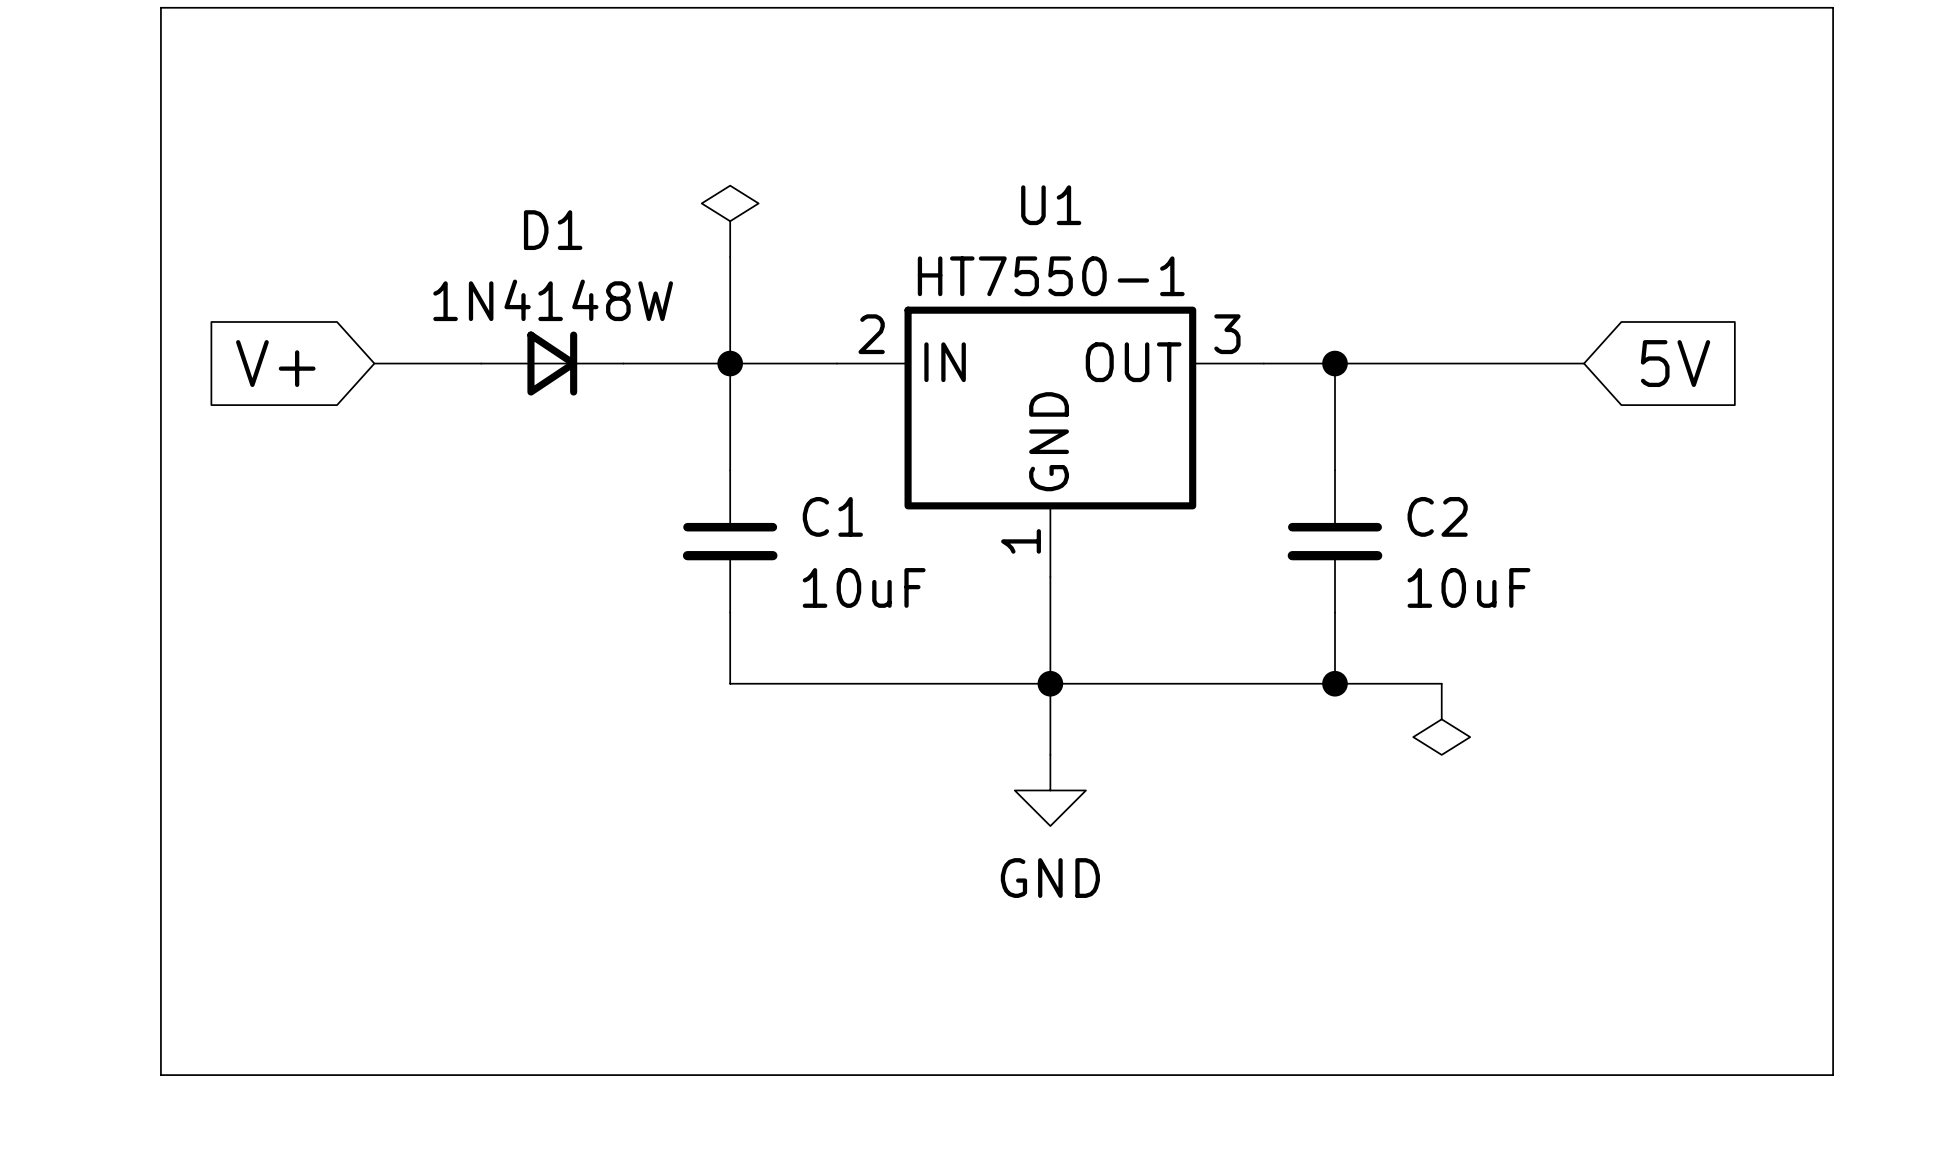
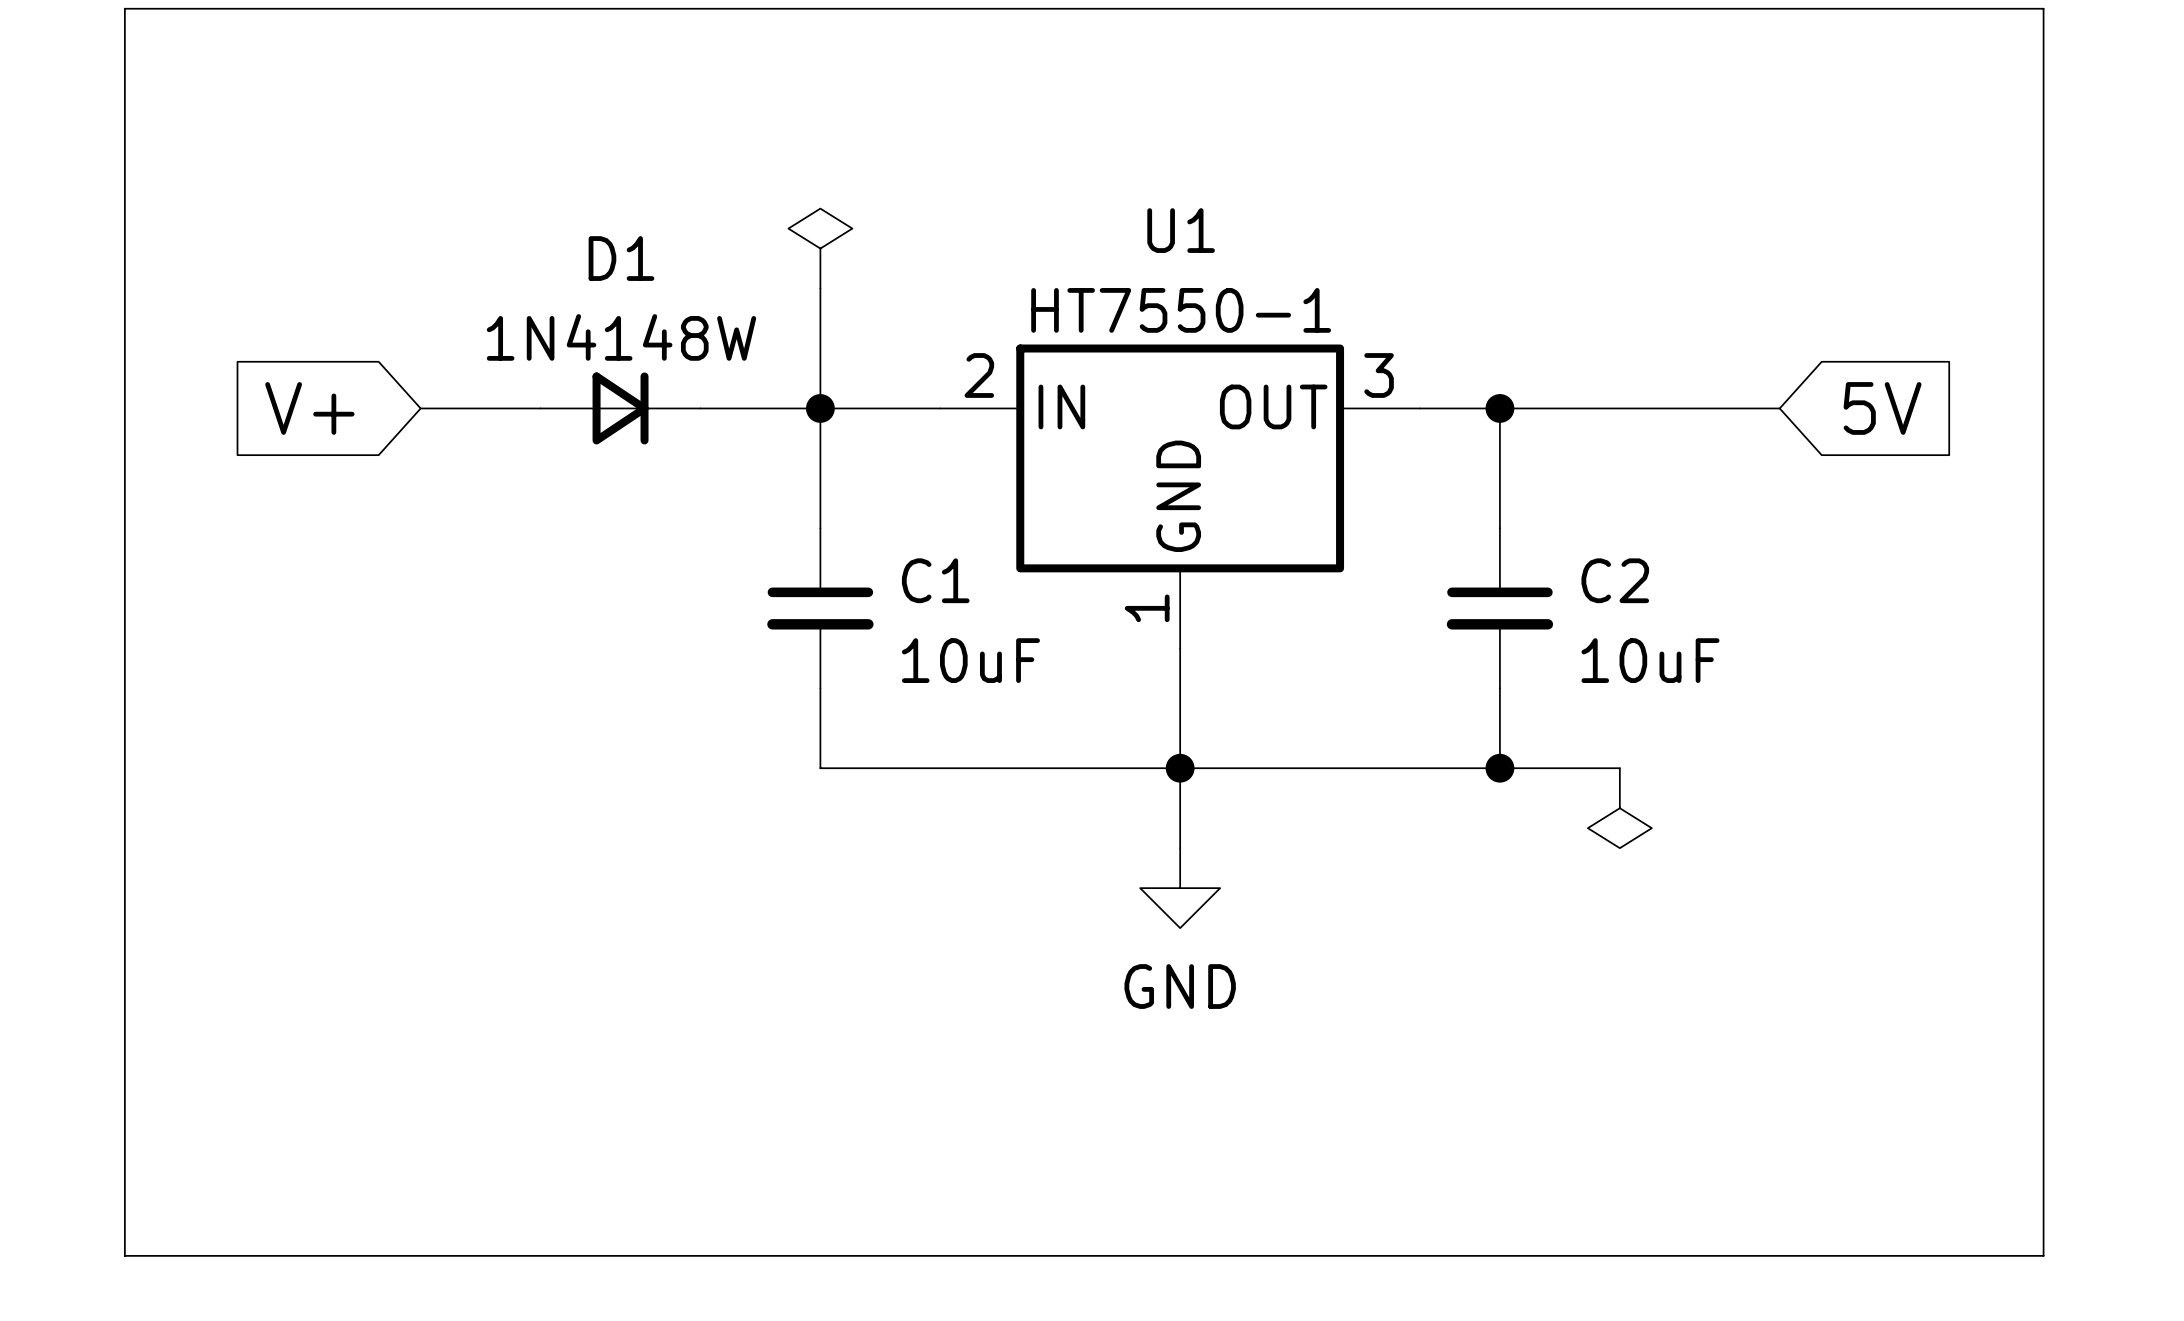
line: (160, 7) (160, 1075) (1833, 1075) (1833, 7) (1818, 7) -> (180, 8) (124, 8) (124, 1255) (2043, 1255) (2043, 8)

